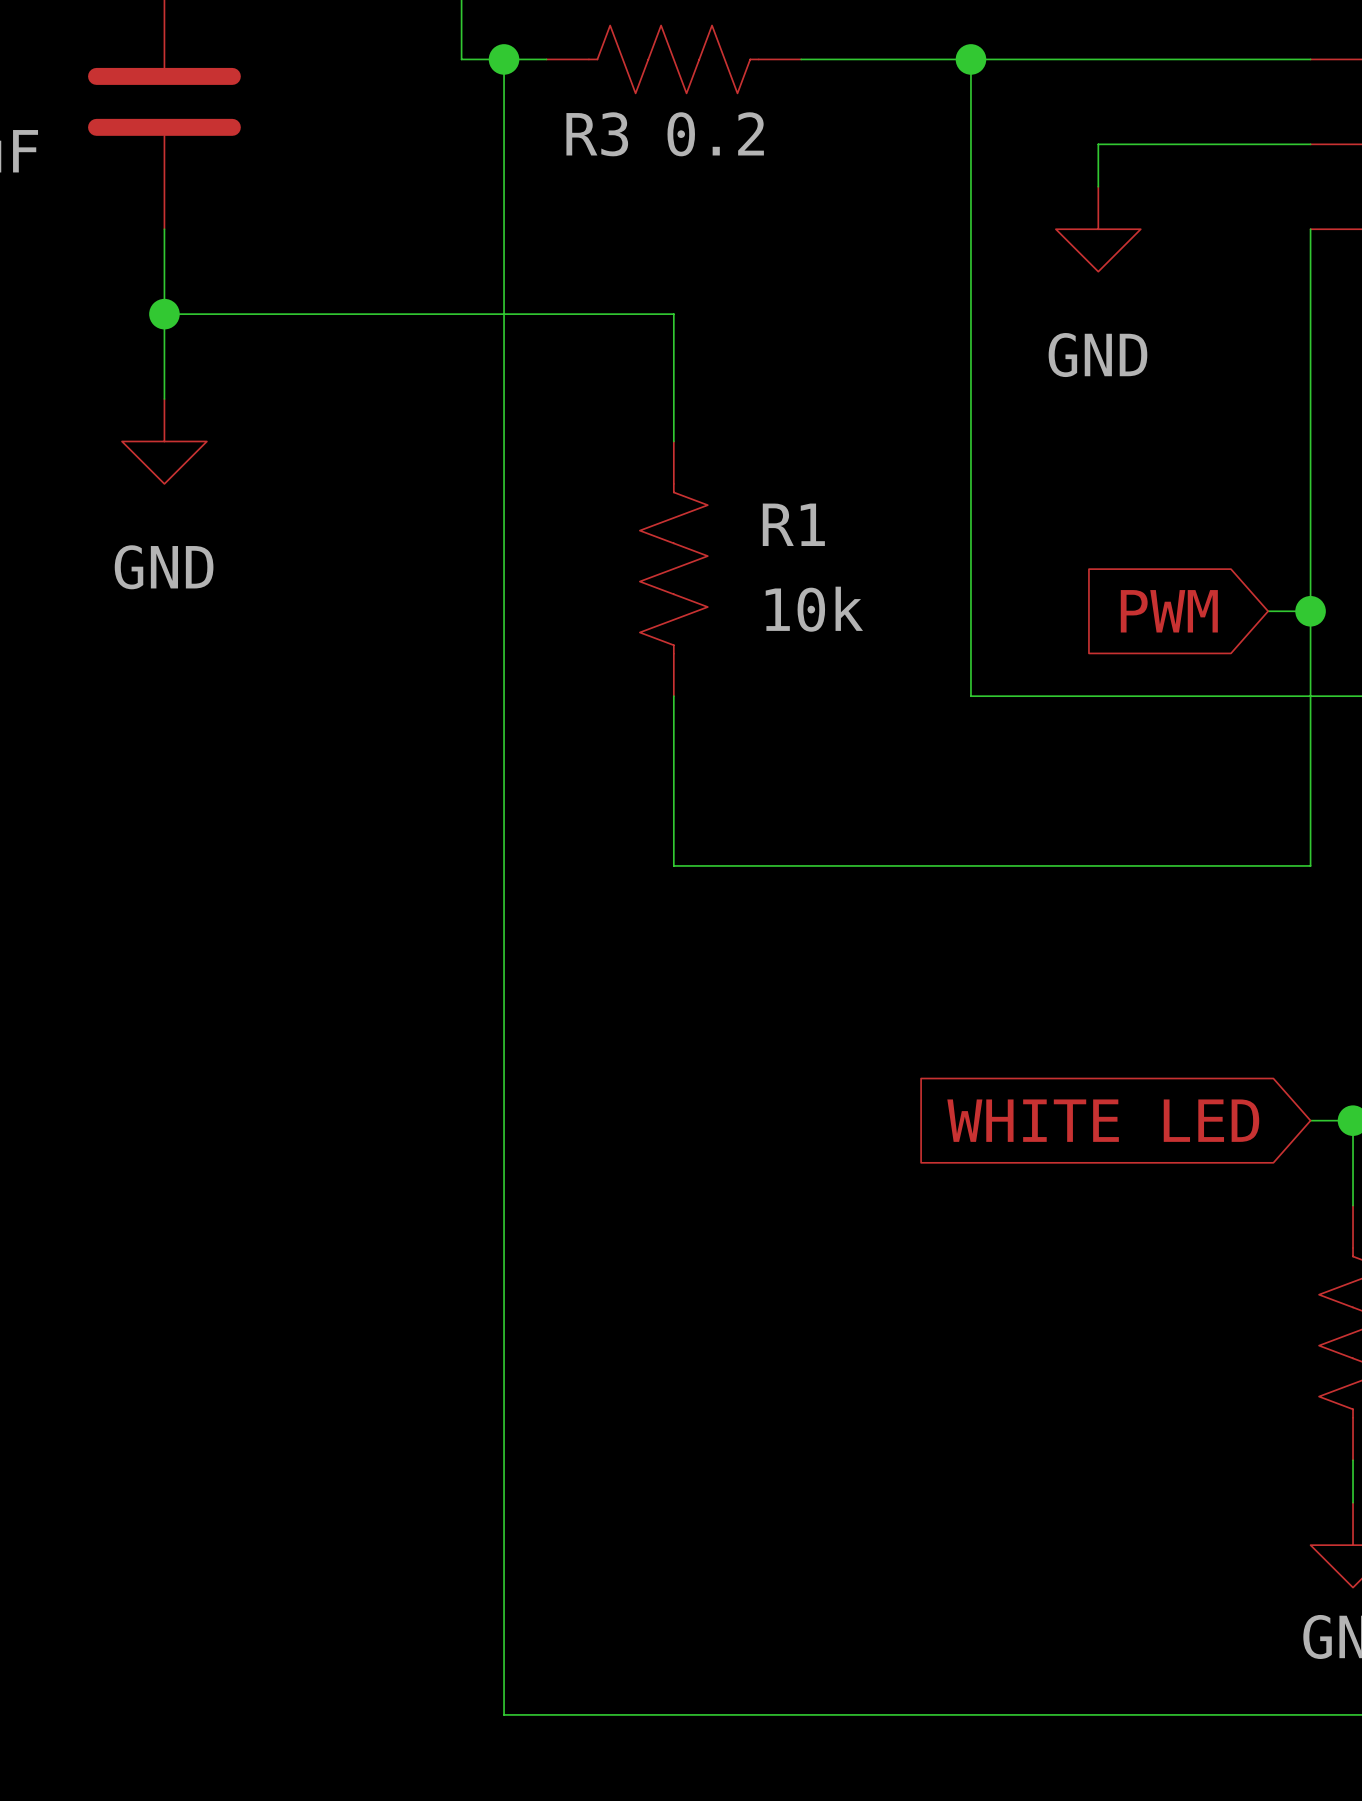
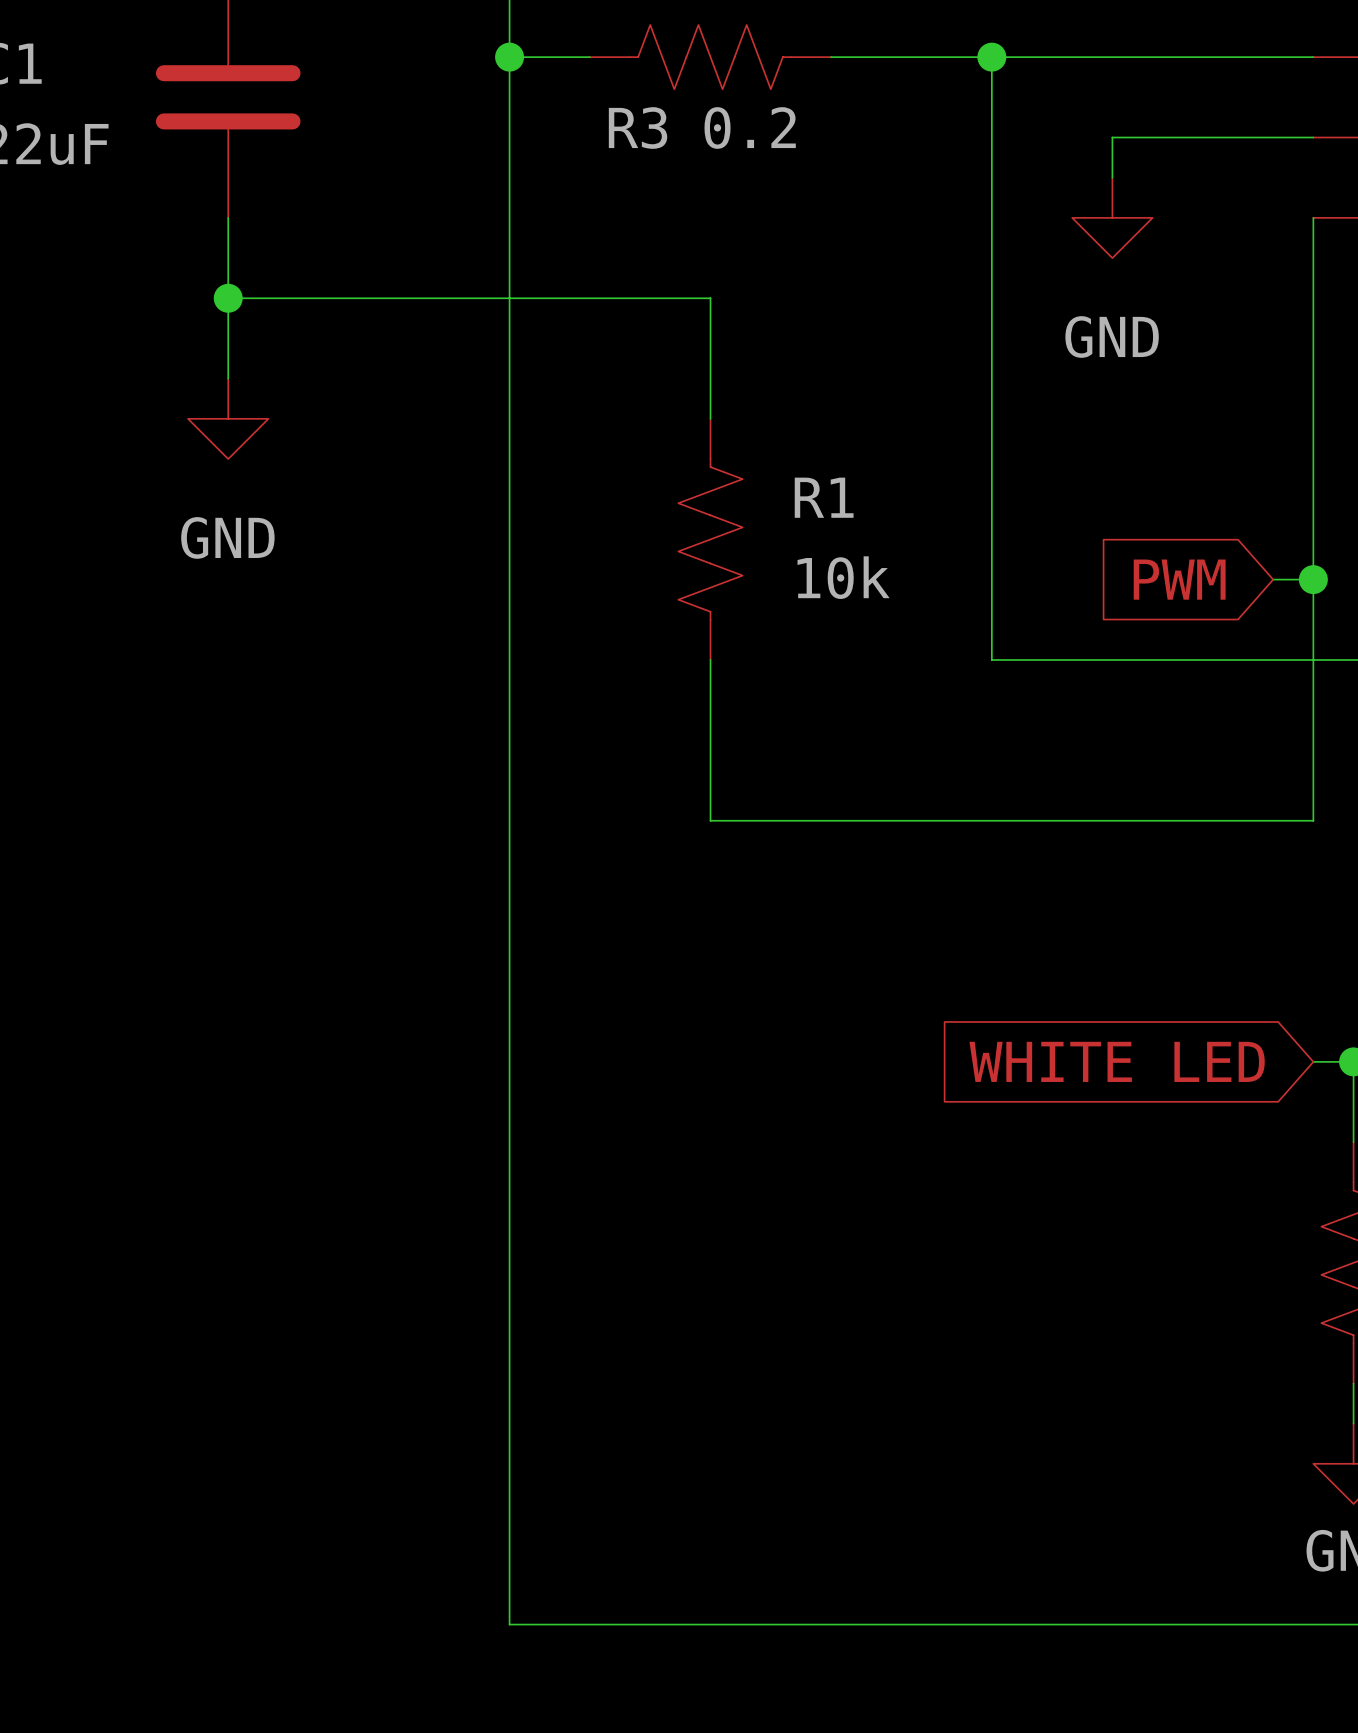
wire: (504, 59) (504, 1714) -> (509, 57) (509, 1624) (549, 1624)
junction position: (504, 59) -> (509, 57)

